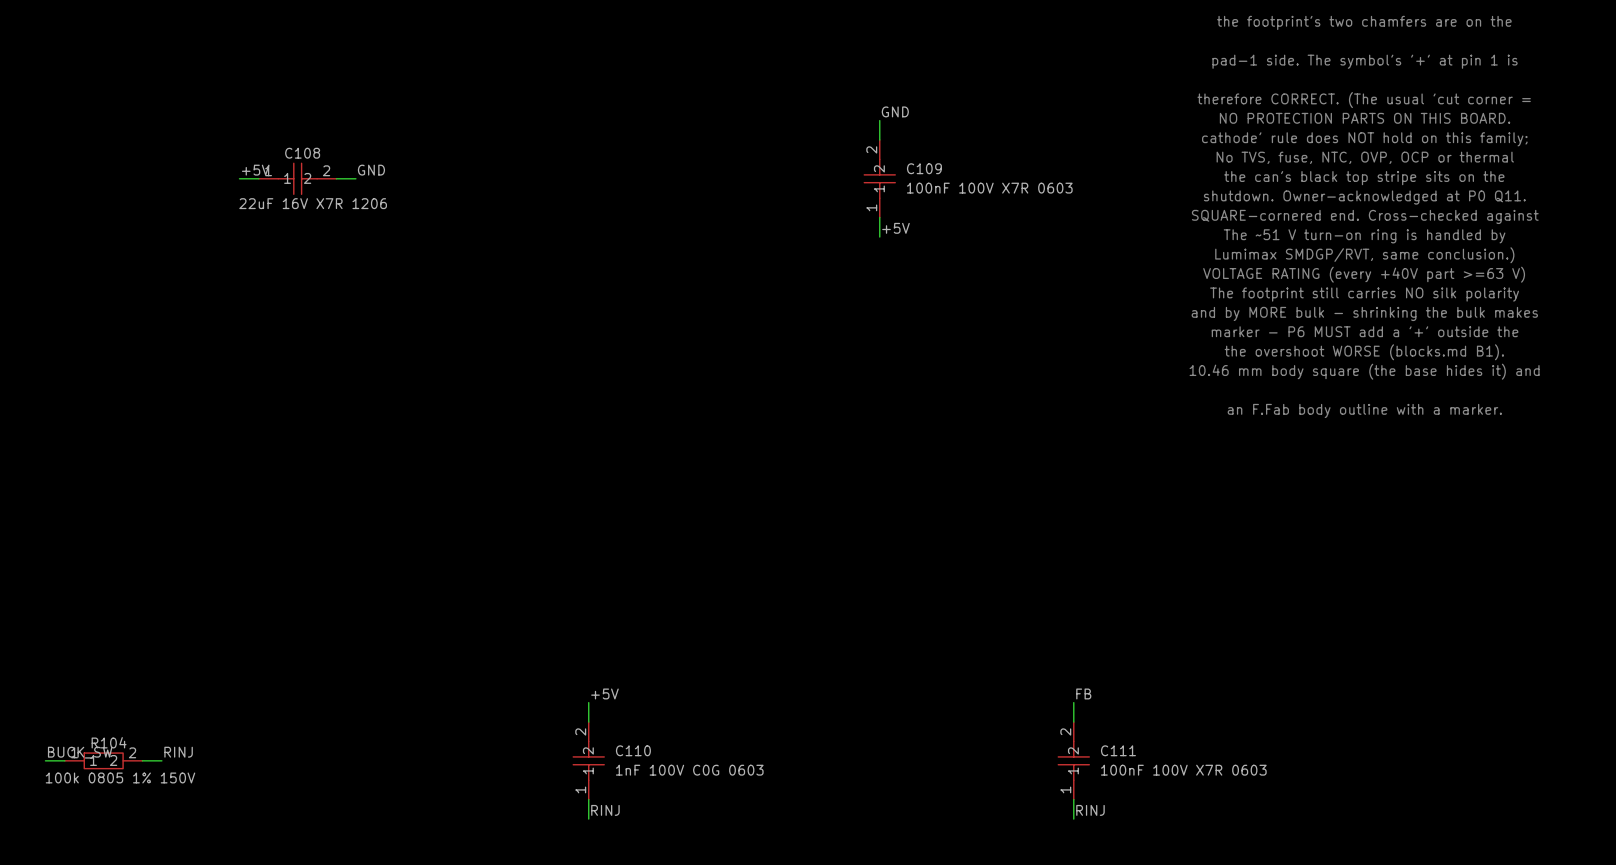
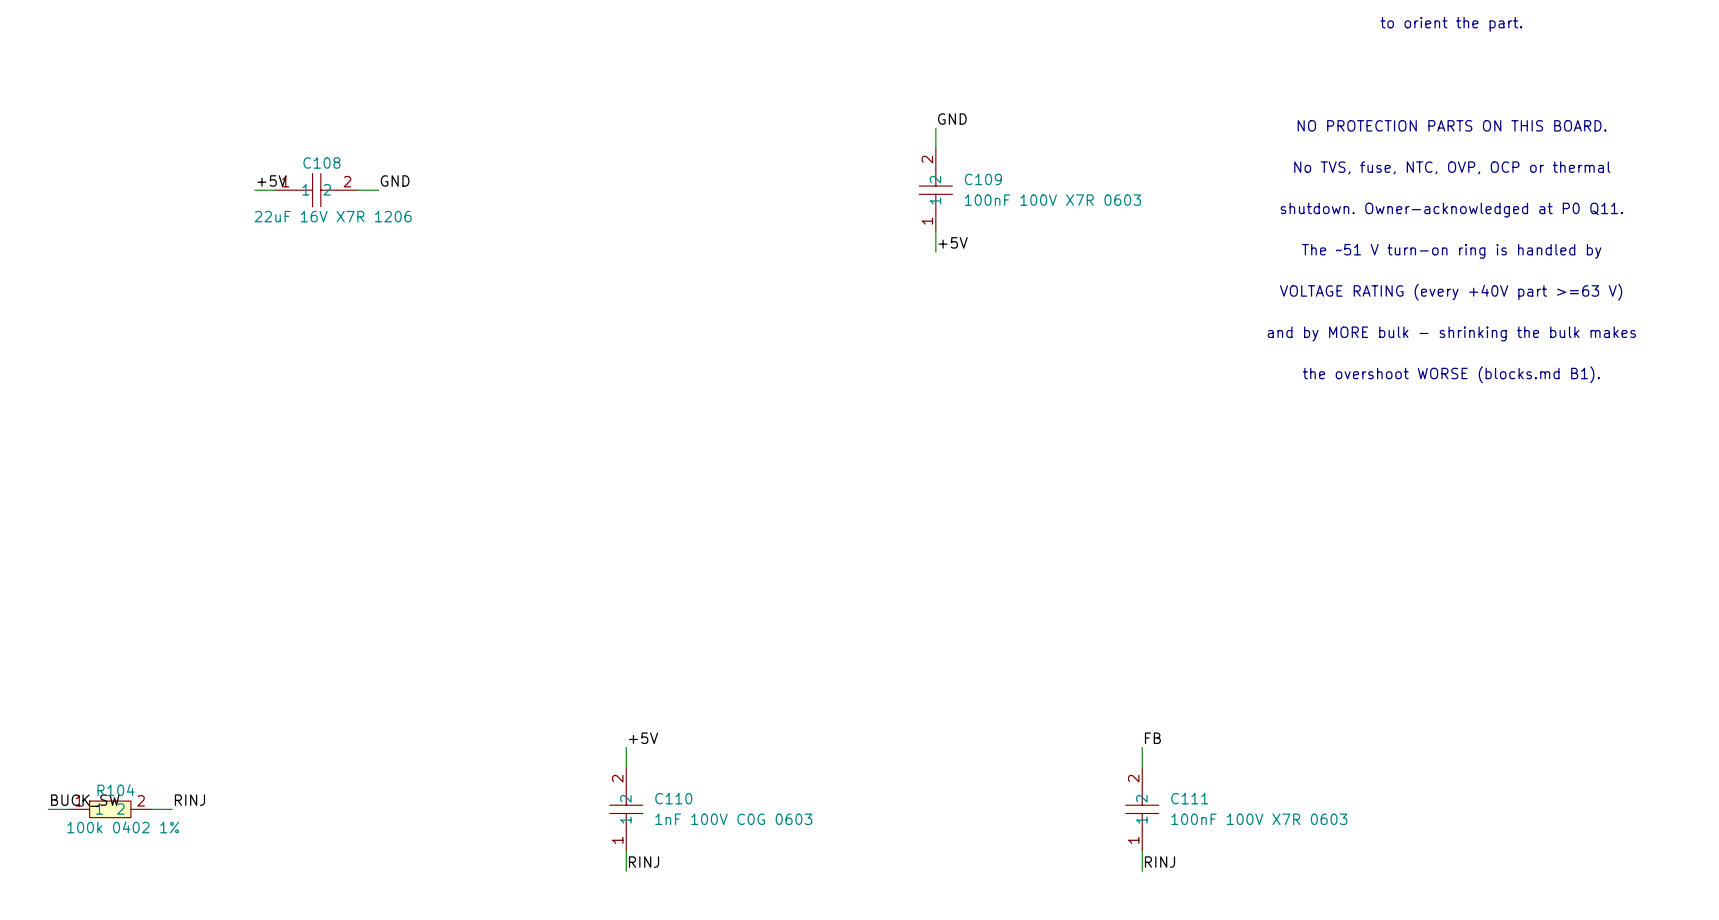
text: the footprint's two chamfers are on the (1364, 22) -> to orient the part. (1451, 24)
text: pad-1 side. The symbol's '+' at pin 1 is (1365, 61) -> none
text: therefore CORRECT. (The usual 'cut corner = (1364, 100) -> none
text: cathode' rule does NOT hold on this family; (1364, 139) -> none
text: the can's black top stripe sits on the (1364, 178) -> none
text: SQUARE-cornered end. Cross-checked against (1365, 216) -> none
text: Lumimax SMDGP/RVT, same conclusion.) (1364, 255) -> none
text: The footprint still carries NO silk polarity (1364, 294) -> none
text: marker - P6 MUST add a '+' outside the (1365, 331) -> none
text: 10.46 mm body square (the base hides it) and (1364, 371) -> none
text: an F.Fab body outline with a marker. (1364, 410) -> none
R104 value: 100k 0805 1% 150V (120, 777) -> 100k 0402 1% (123, 827)

